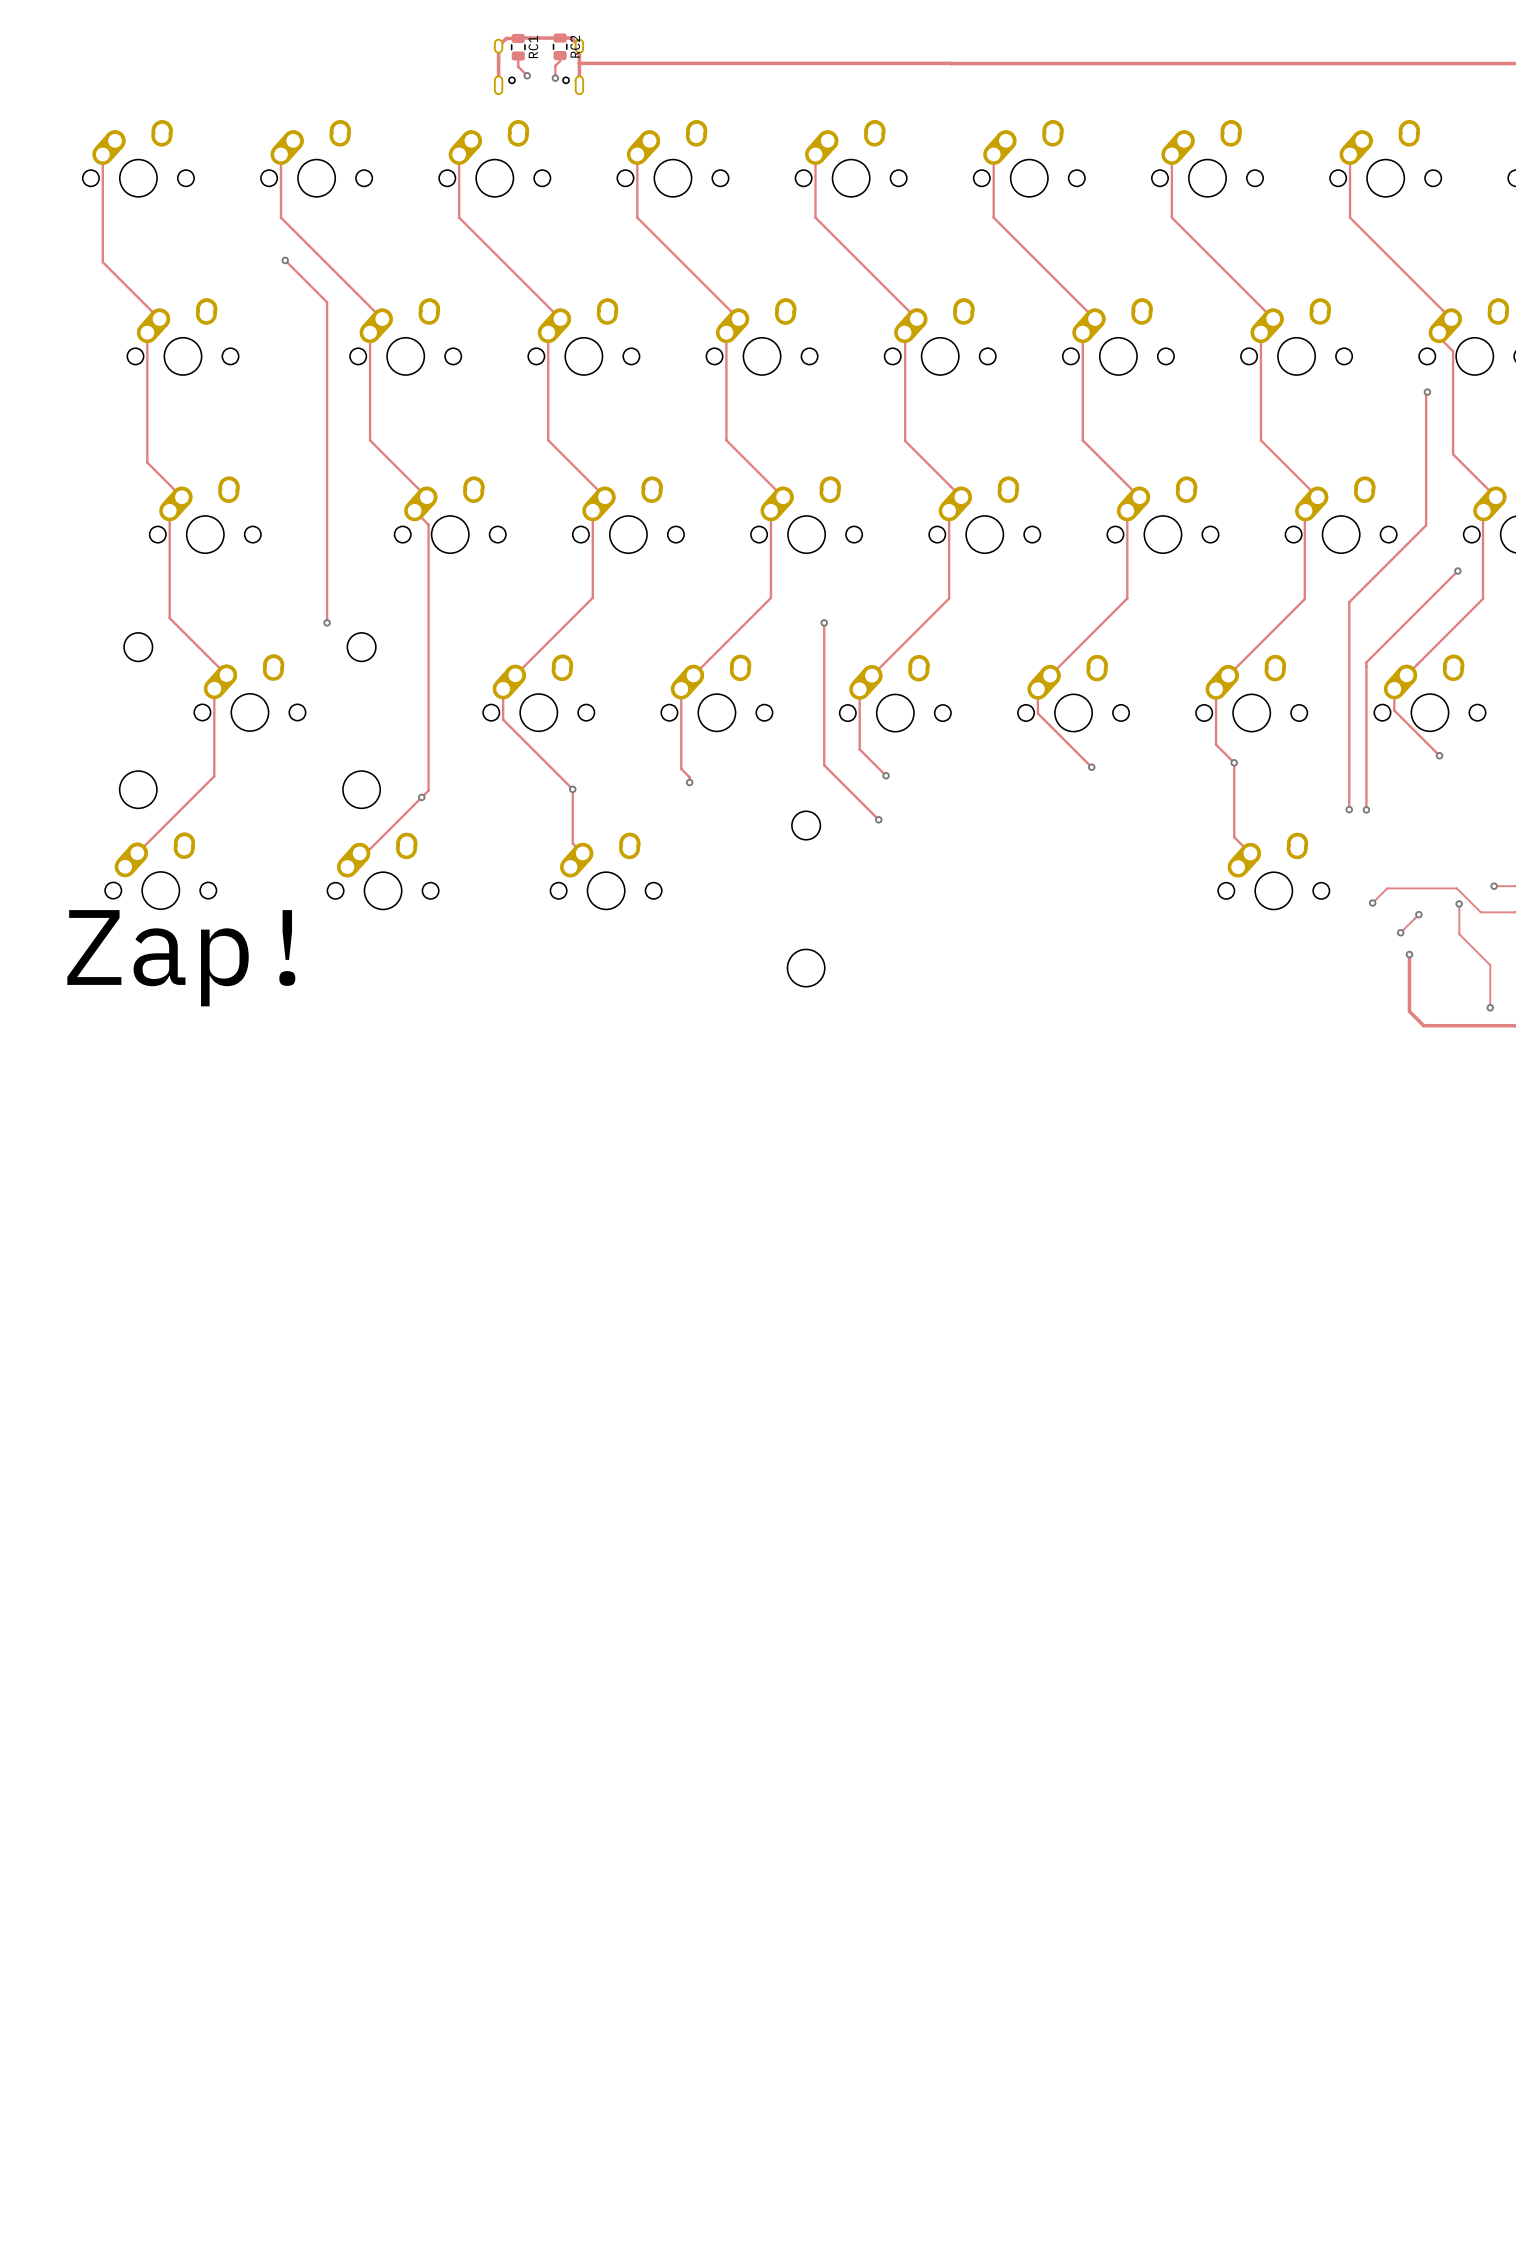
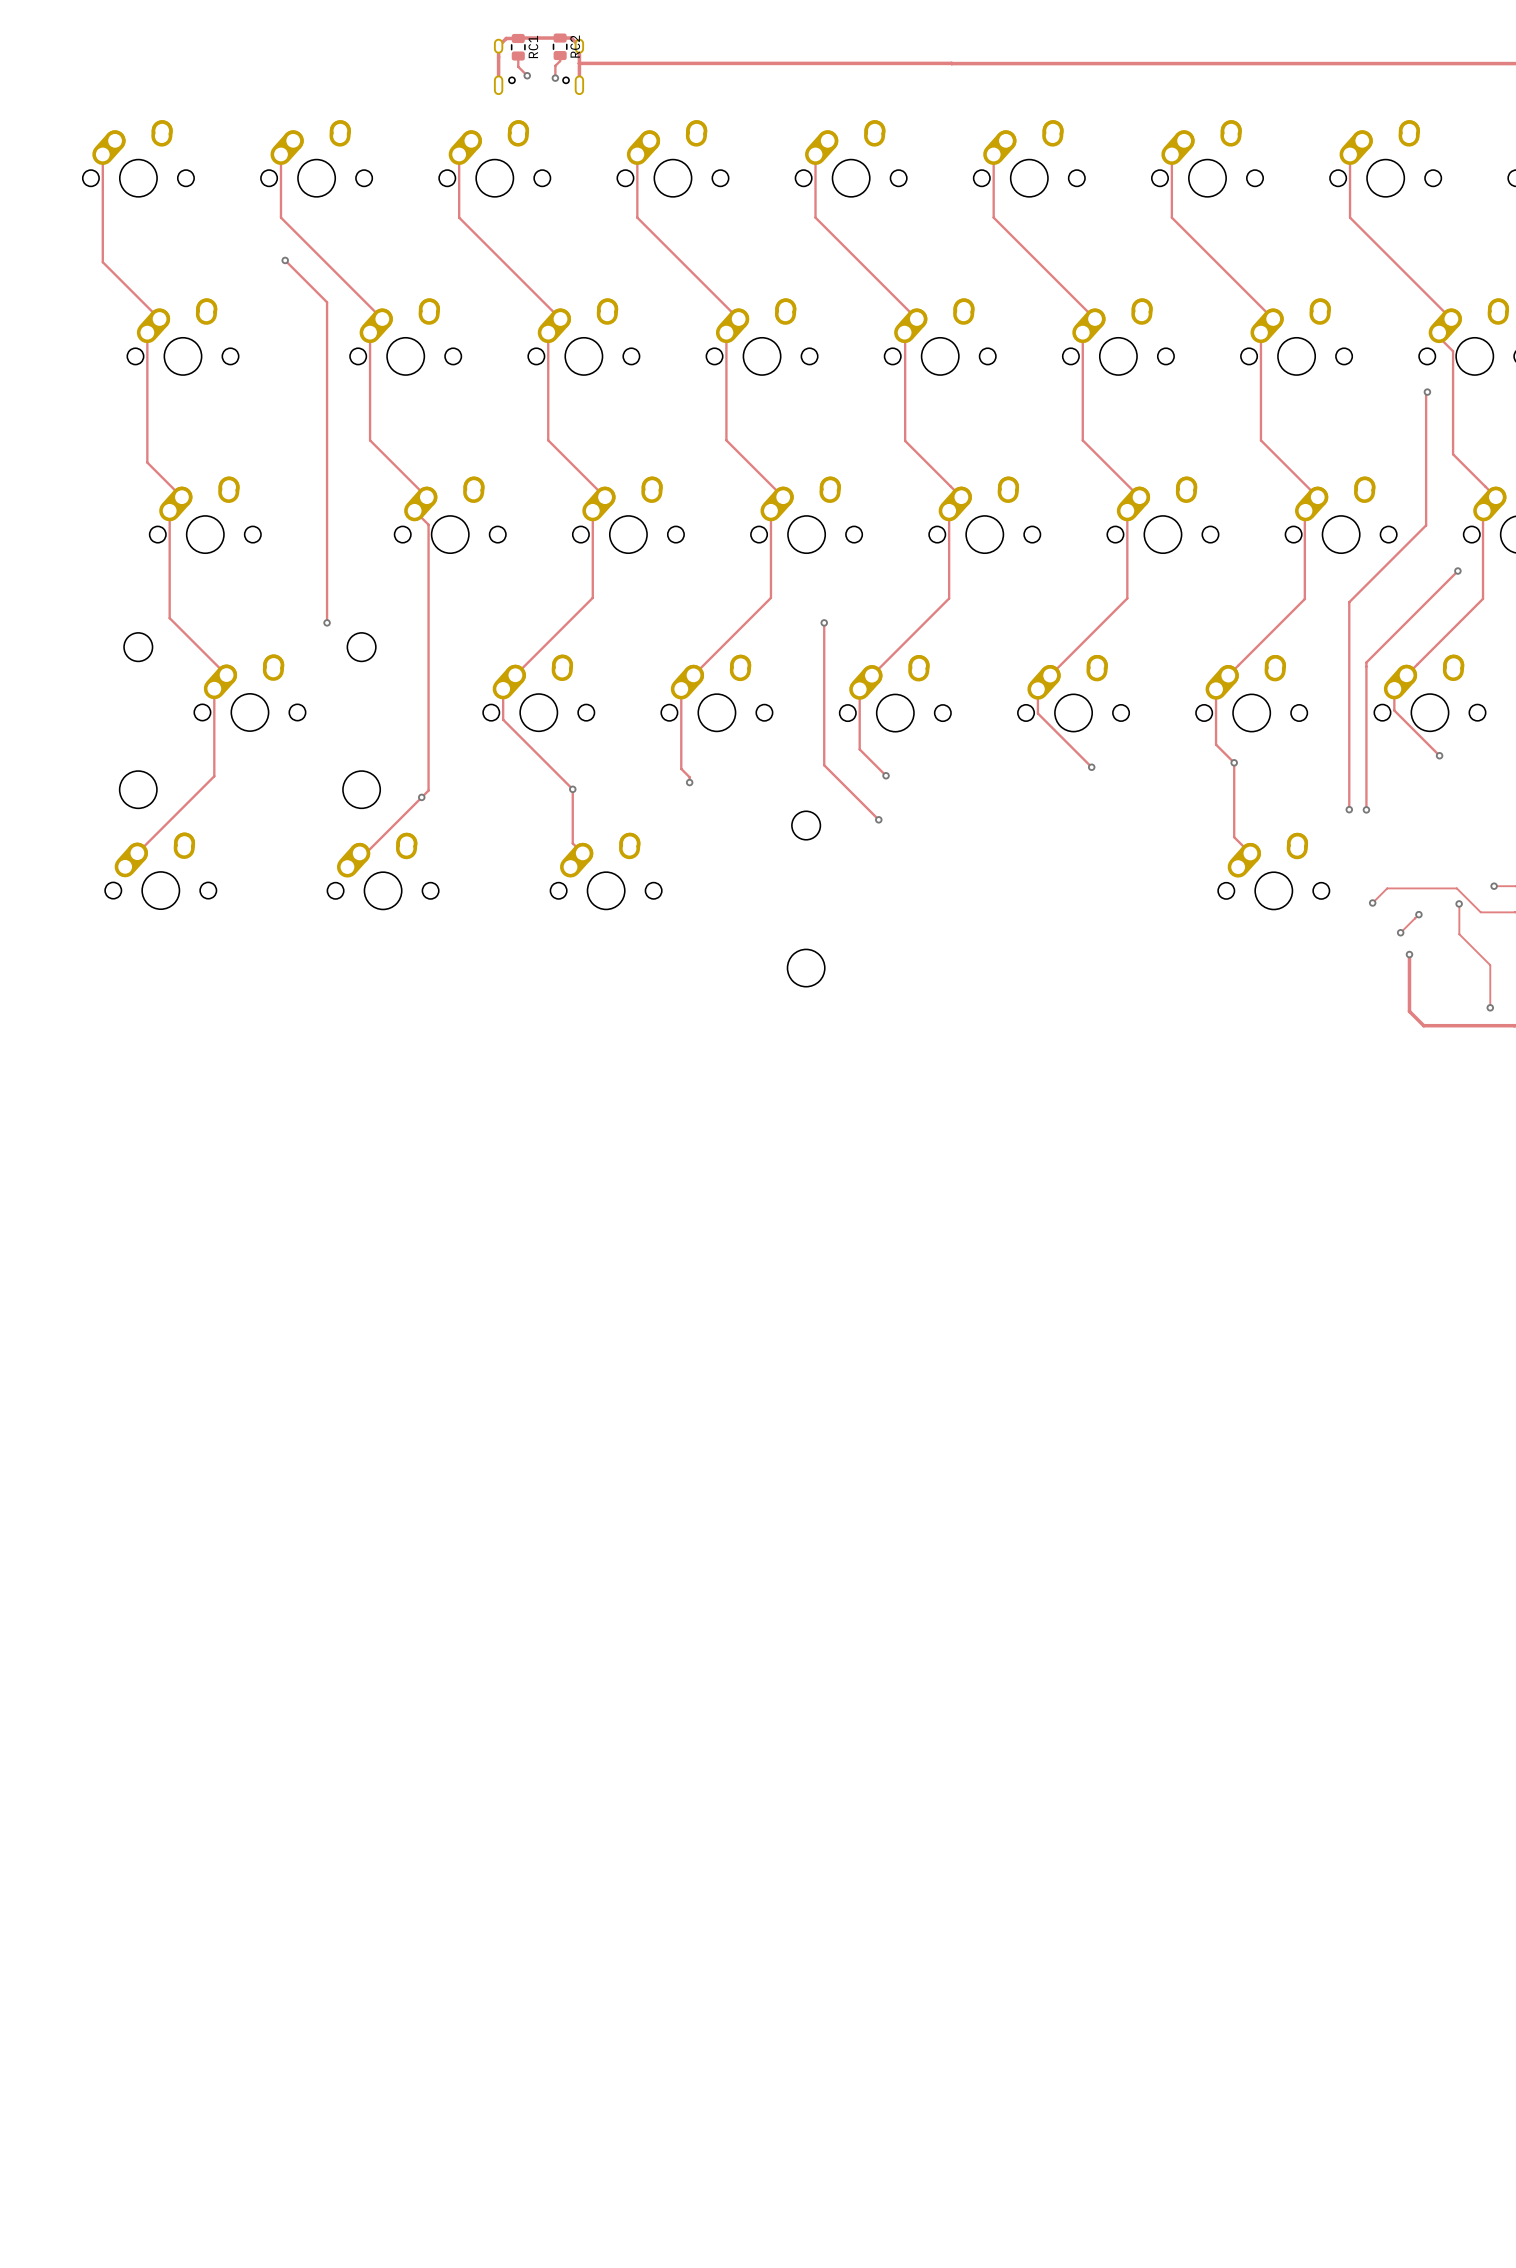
text: Zap! (181, 958) -> none

